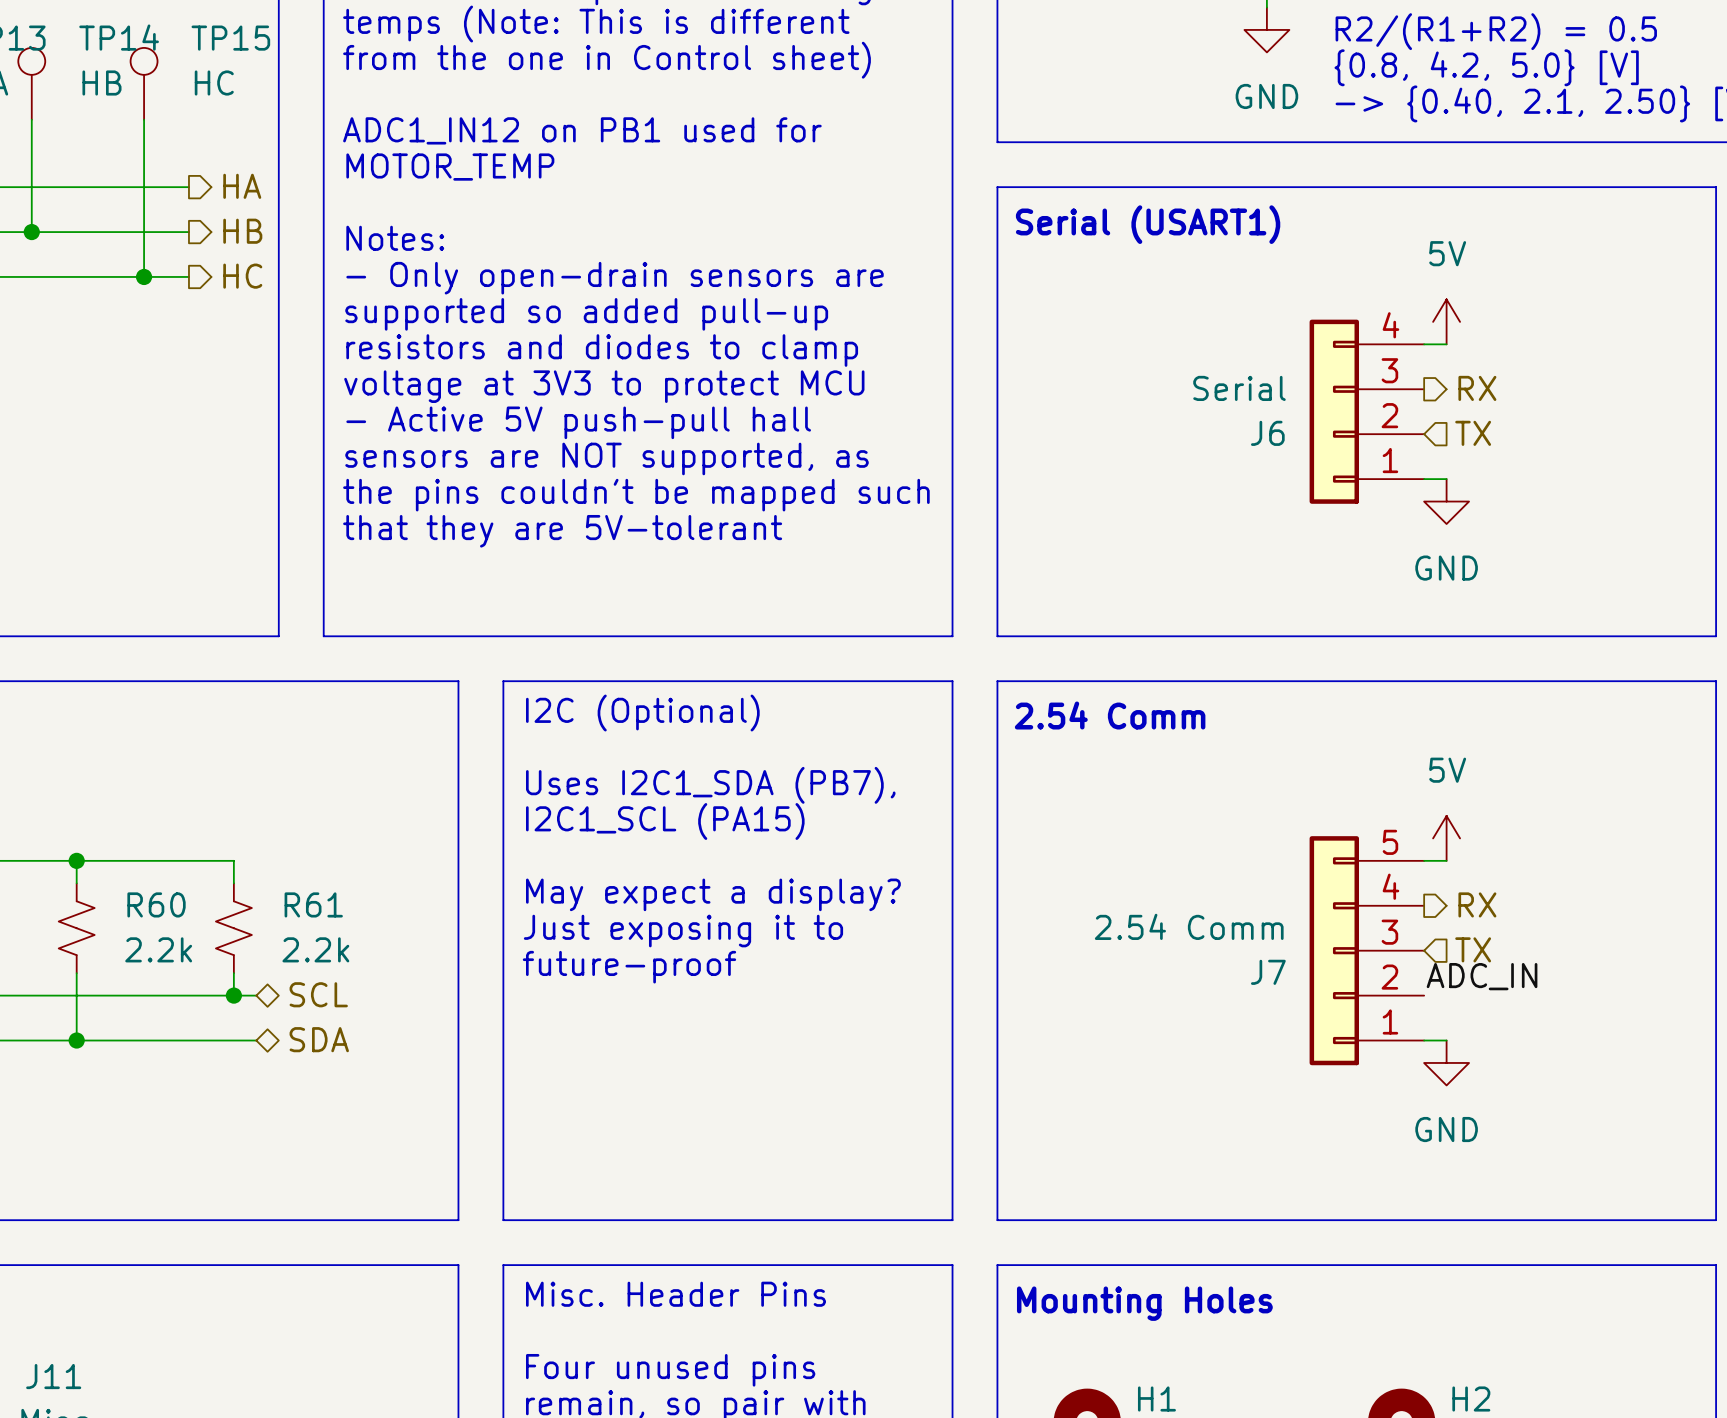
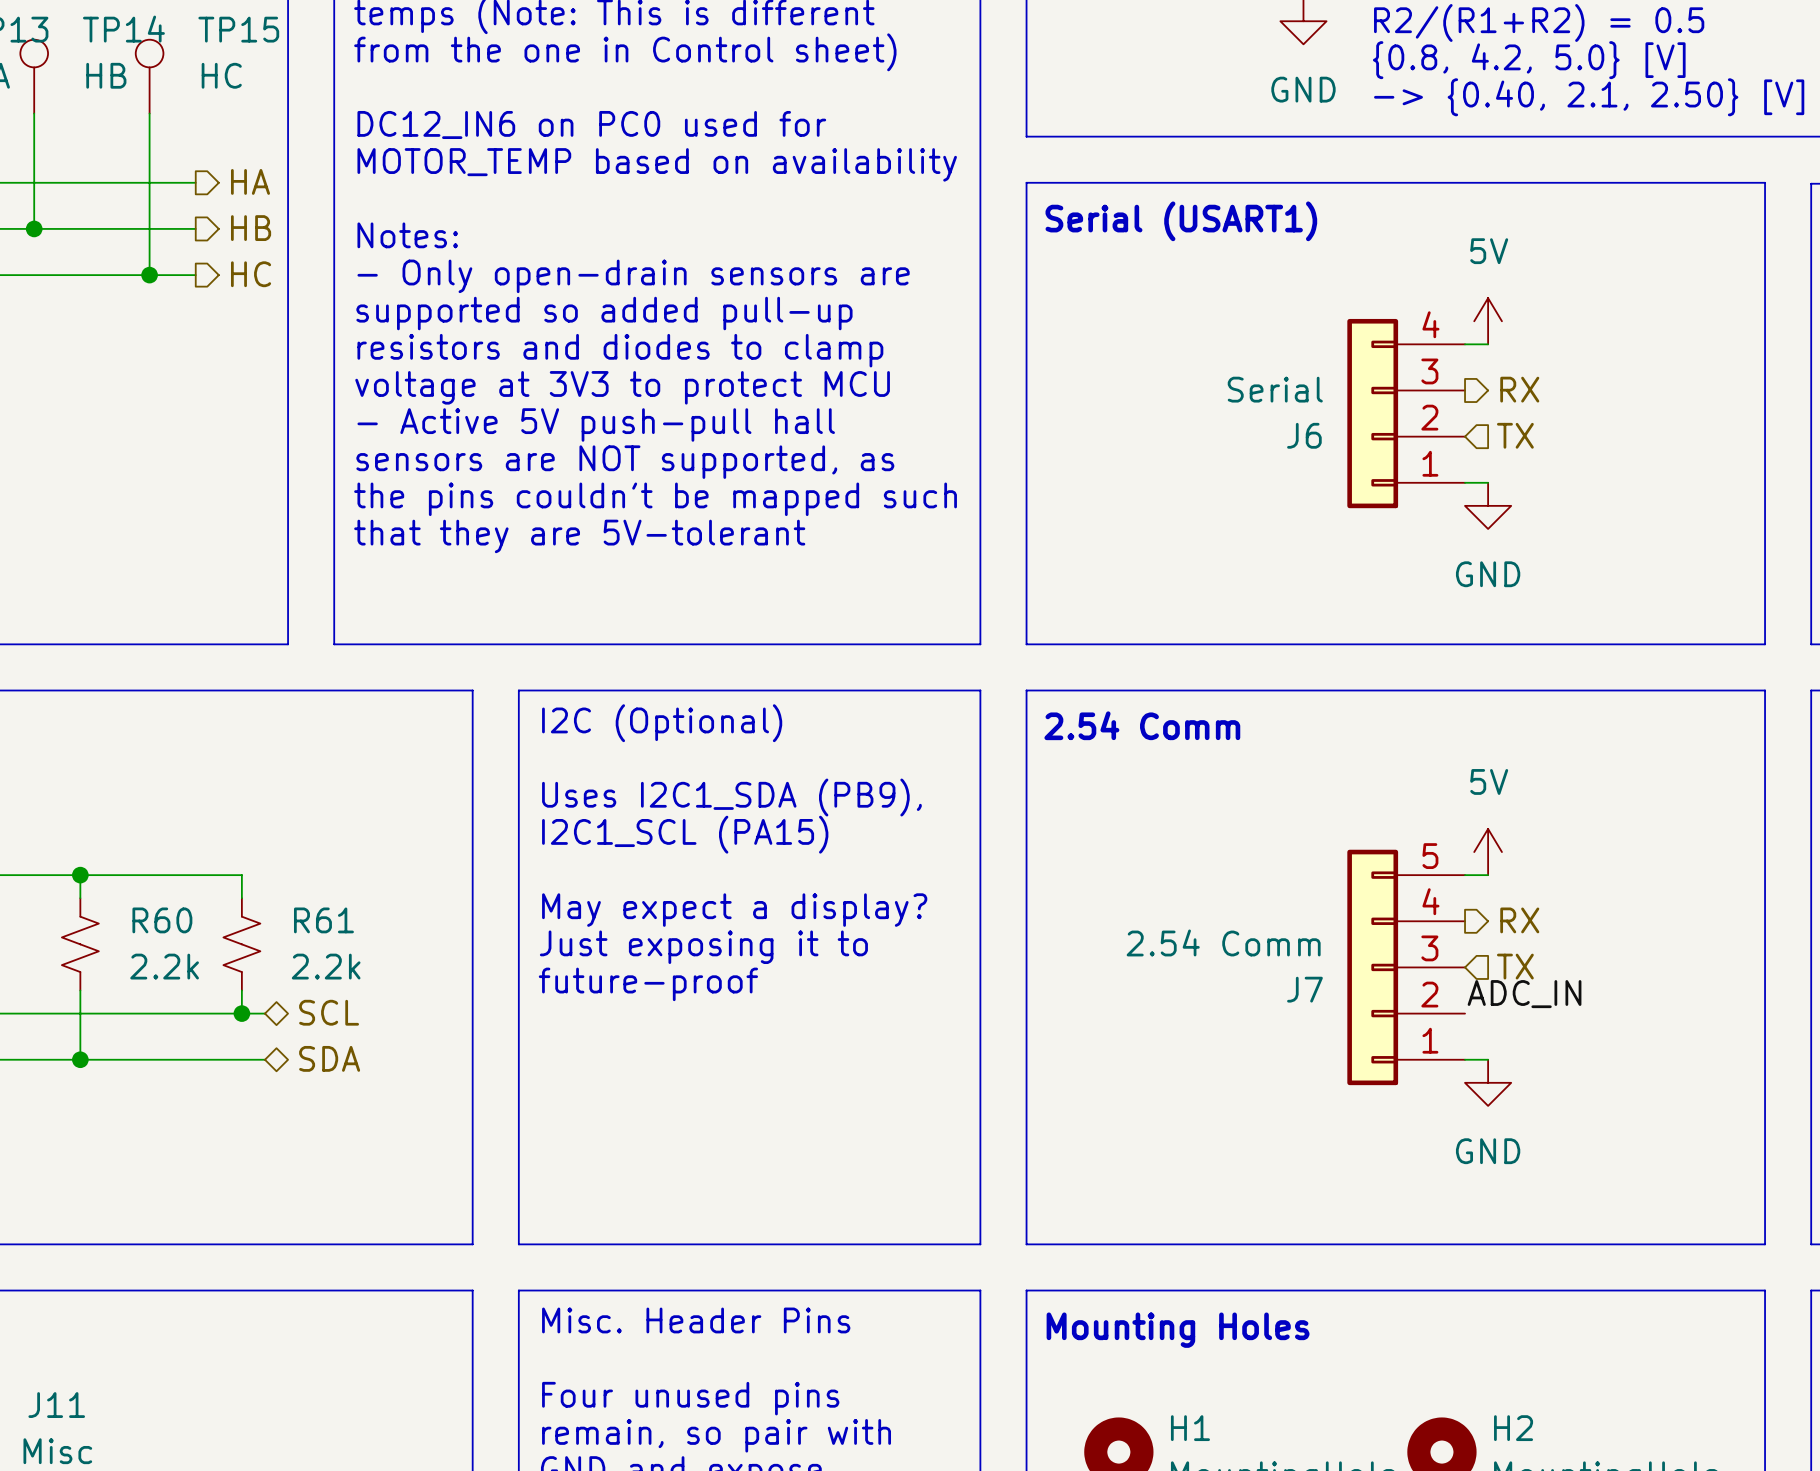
text: ADC1_IN12 on PB1 used for (582, 130) -> DC12_IN6 on PC0 used for (591, 124)
text: MOTOR_TEMP (450, 167) -> MOTOR_TEMP based on availability (657, 164)
text: Uses I2C1_SDA (PB7), (710, 785) -> Uses I2C1_SDA (PB9), (731, 797)

